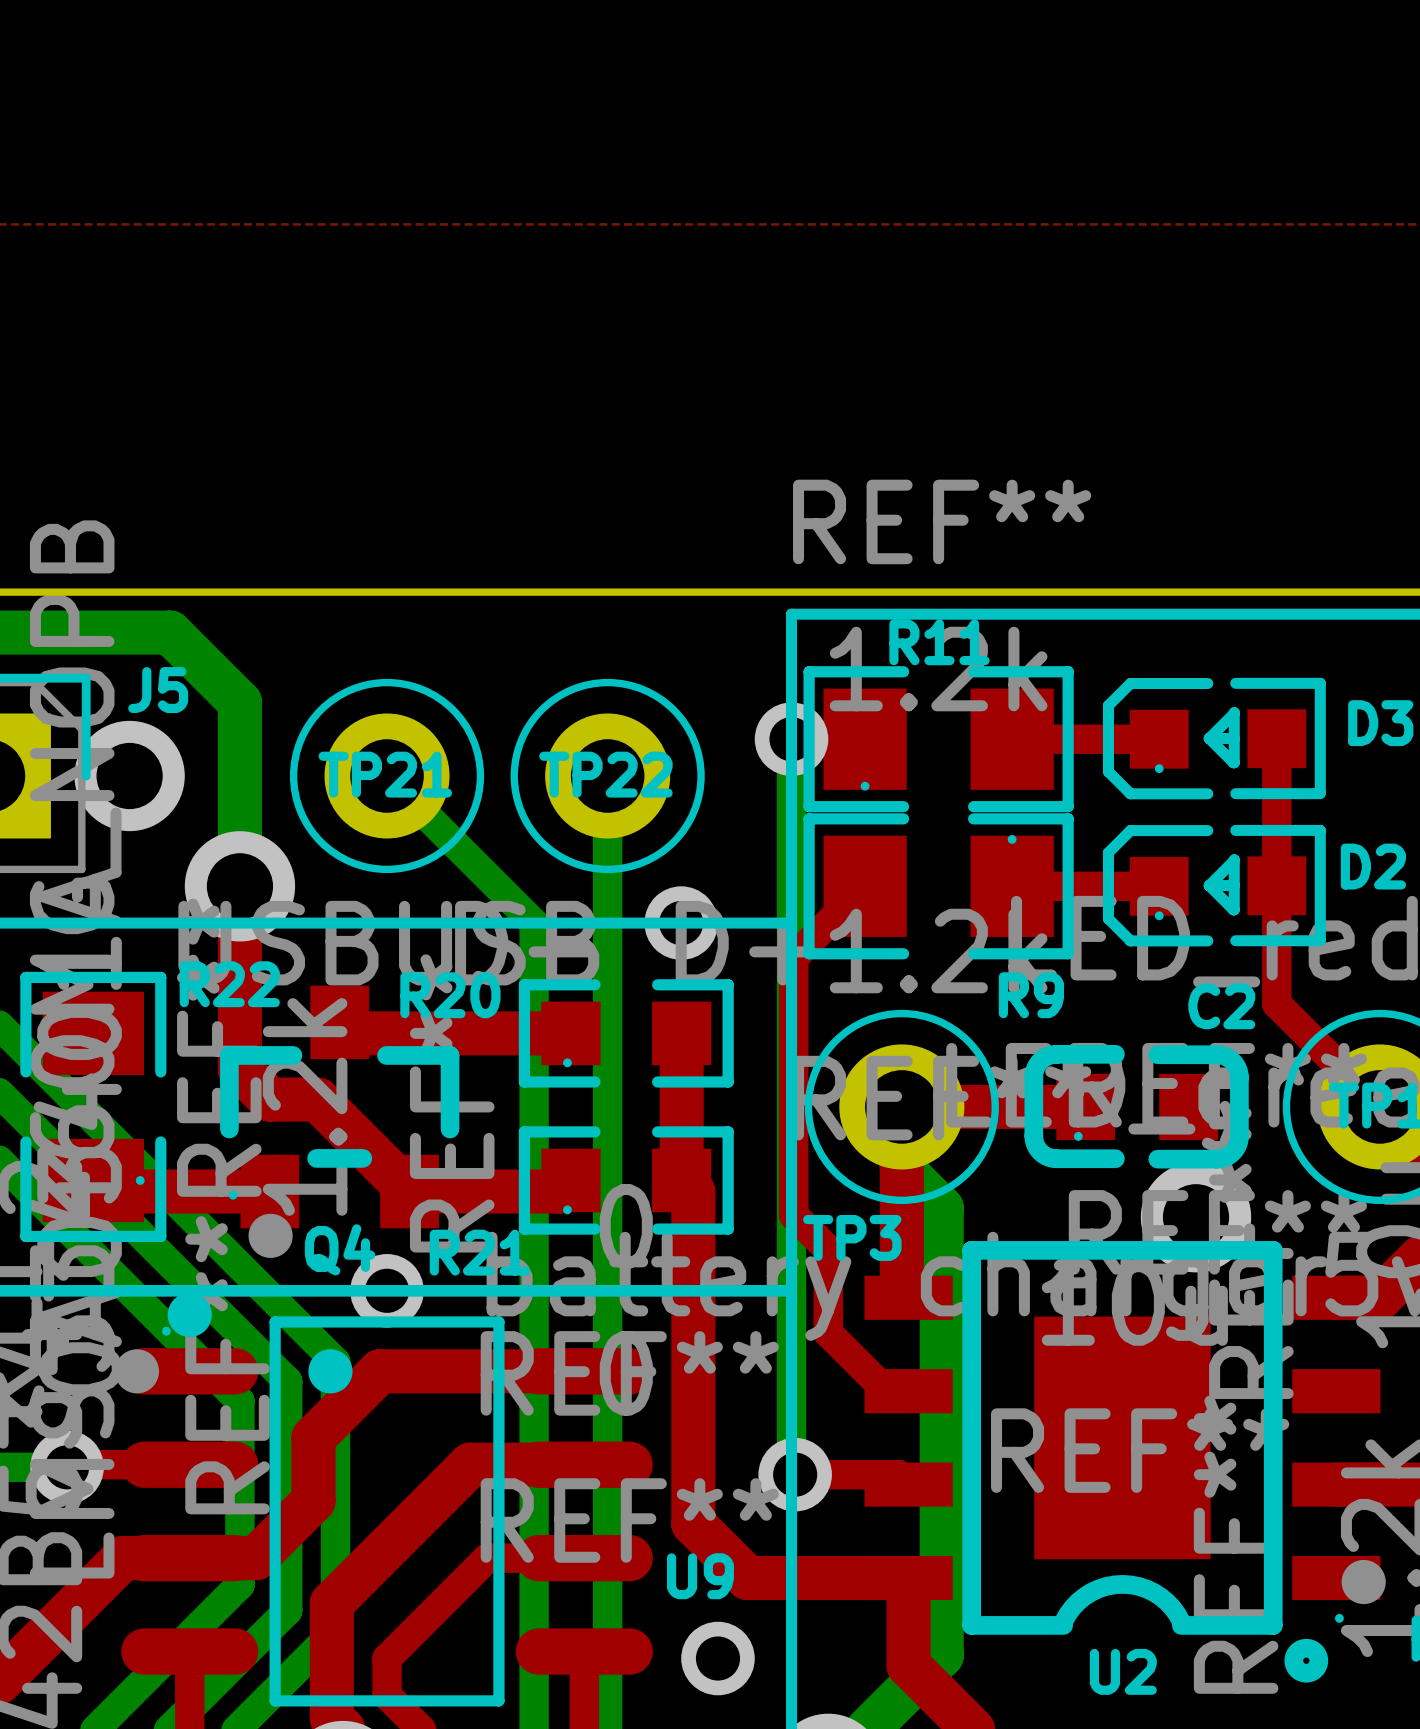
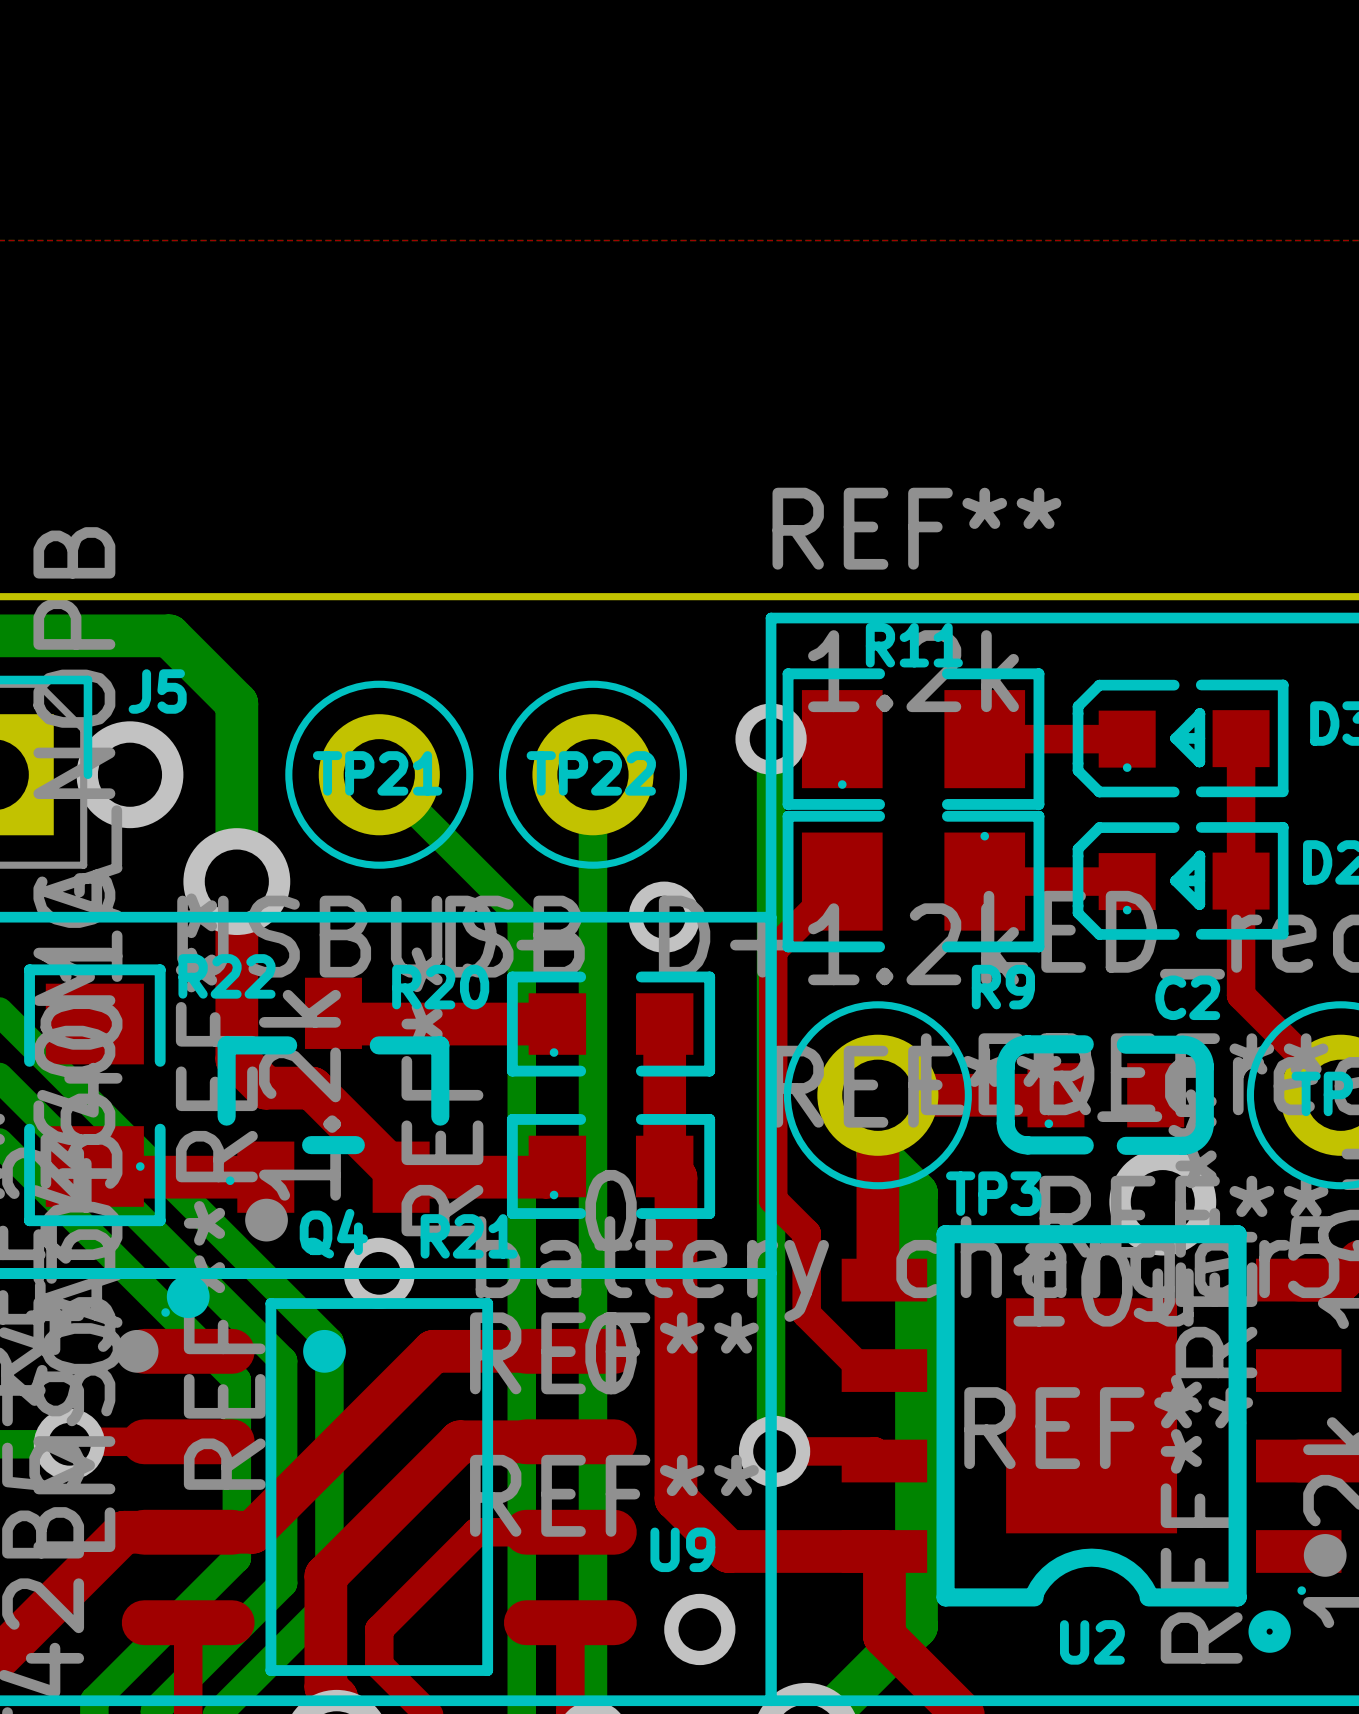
TP3 name position: TP3 (852, 1237) -> TP3 (993, 1193)
top track: (442, 1371) (380, 1371) (313, 1437) (313, 1500) -> (433, 1351) (308, 1476)

